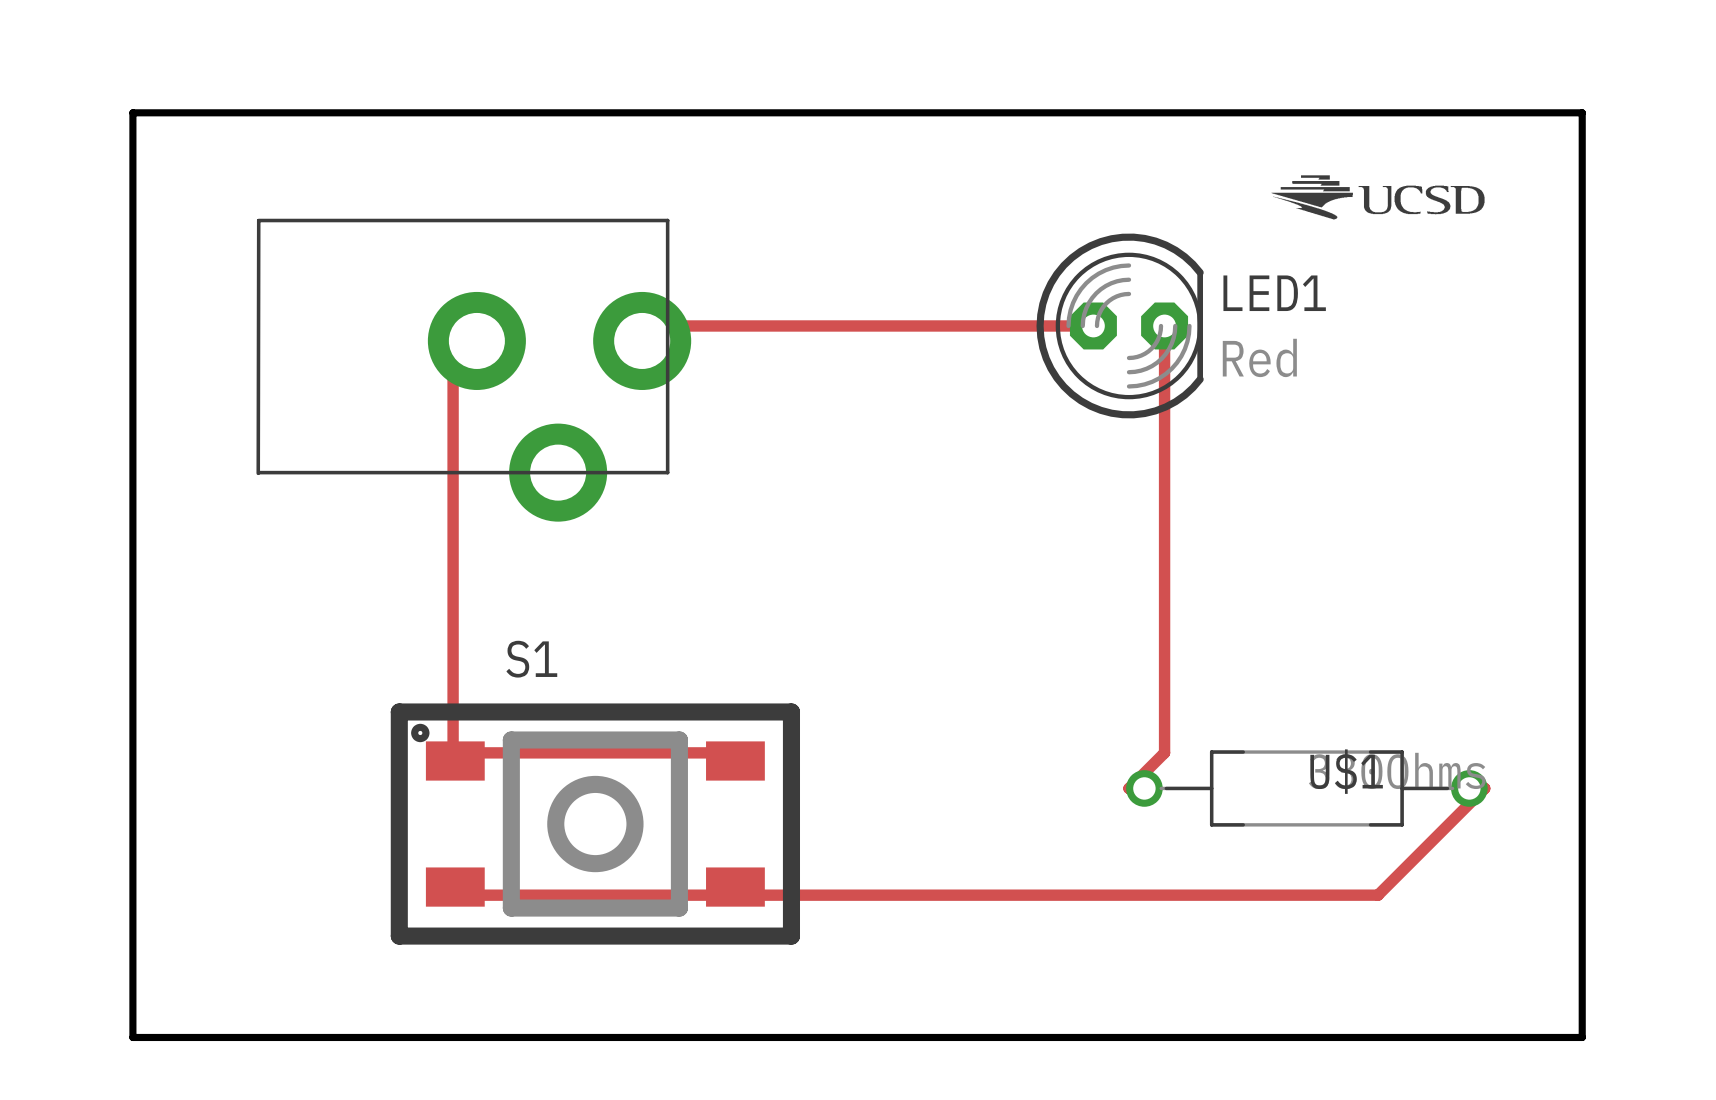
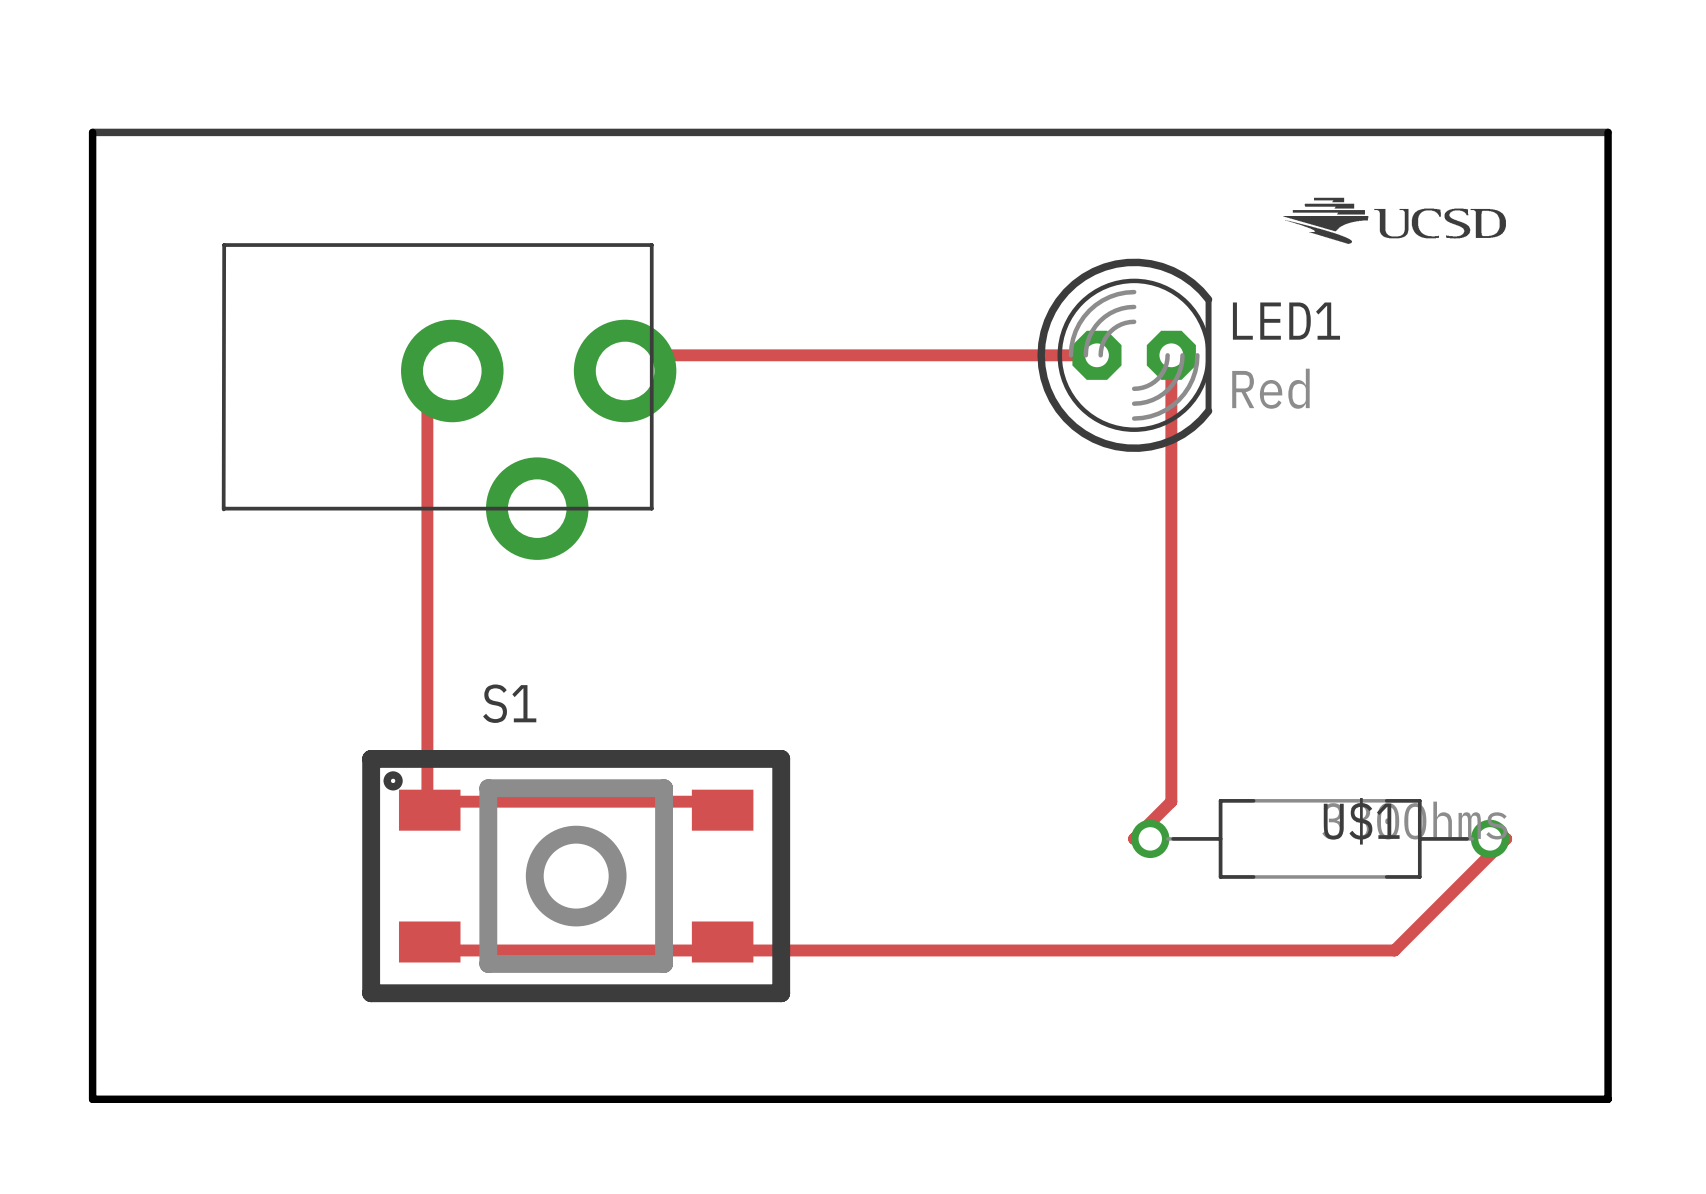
board edge: (132, 112) (1582, 112) -> none
line: none -> (92, 132) (1608, 132)

